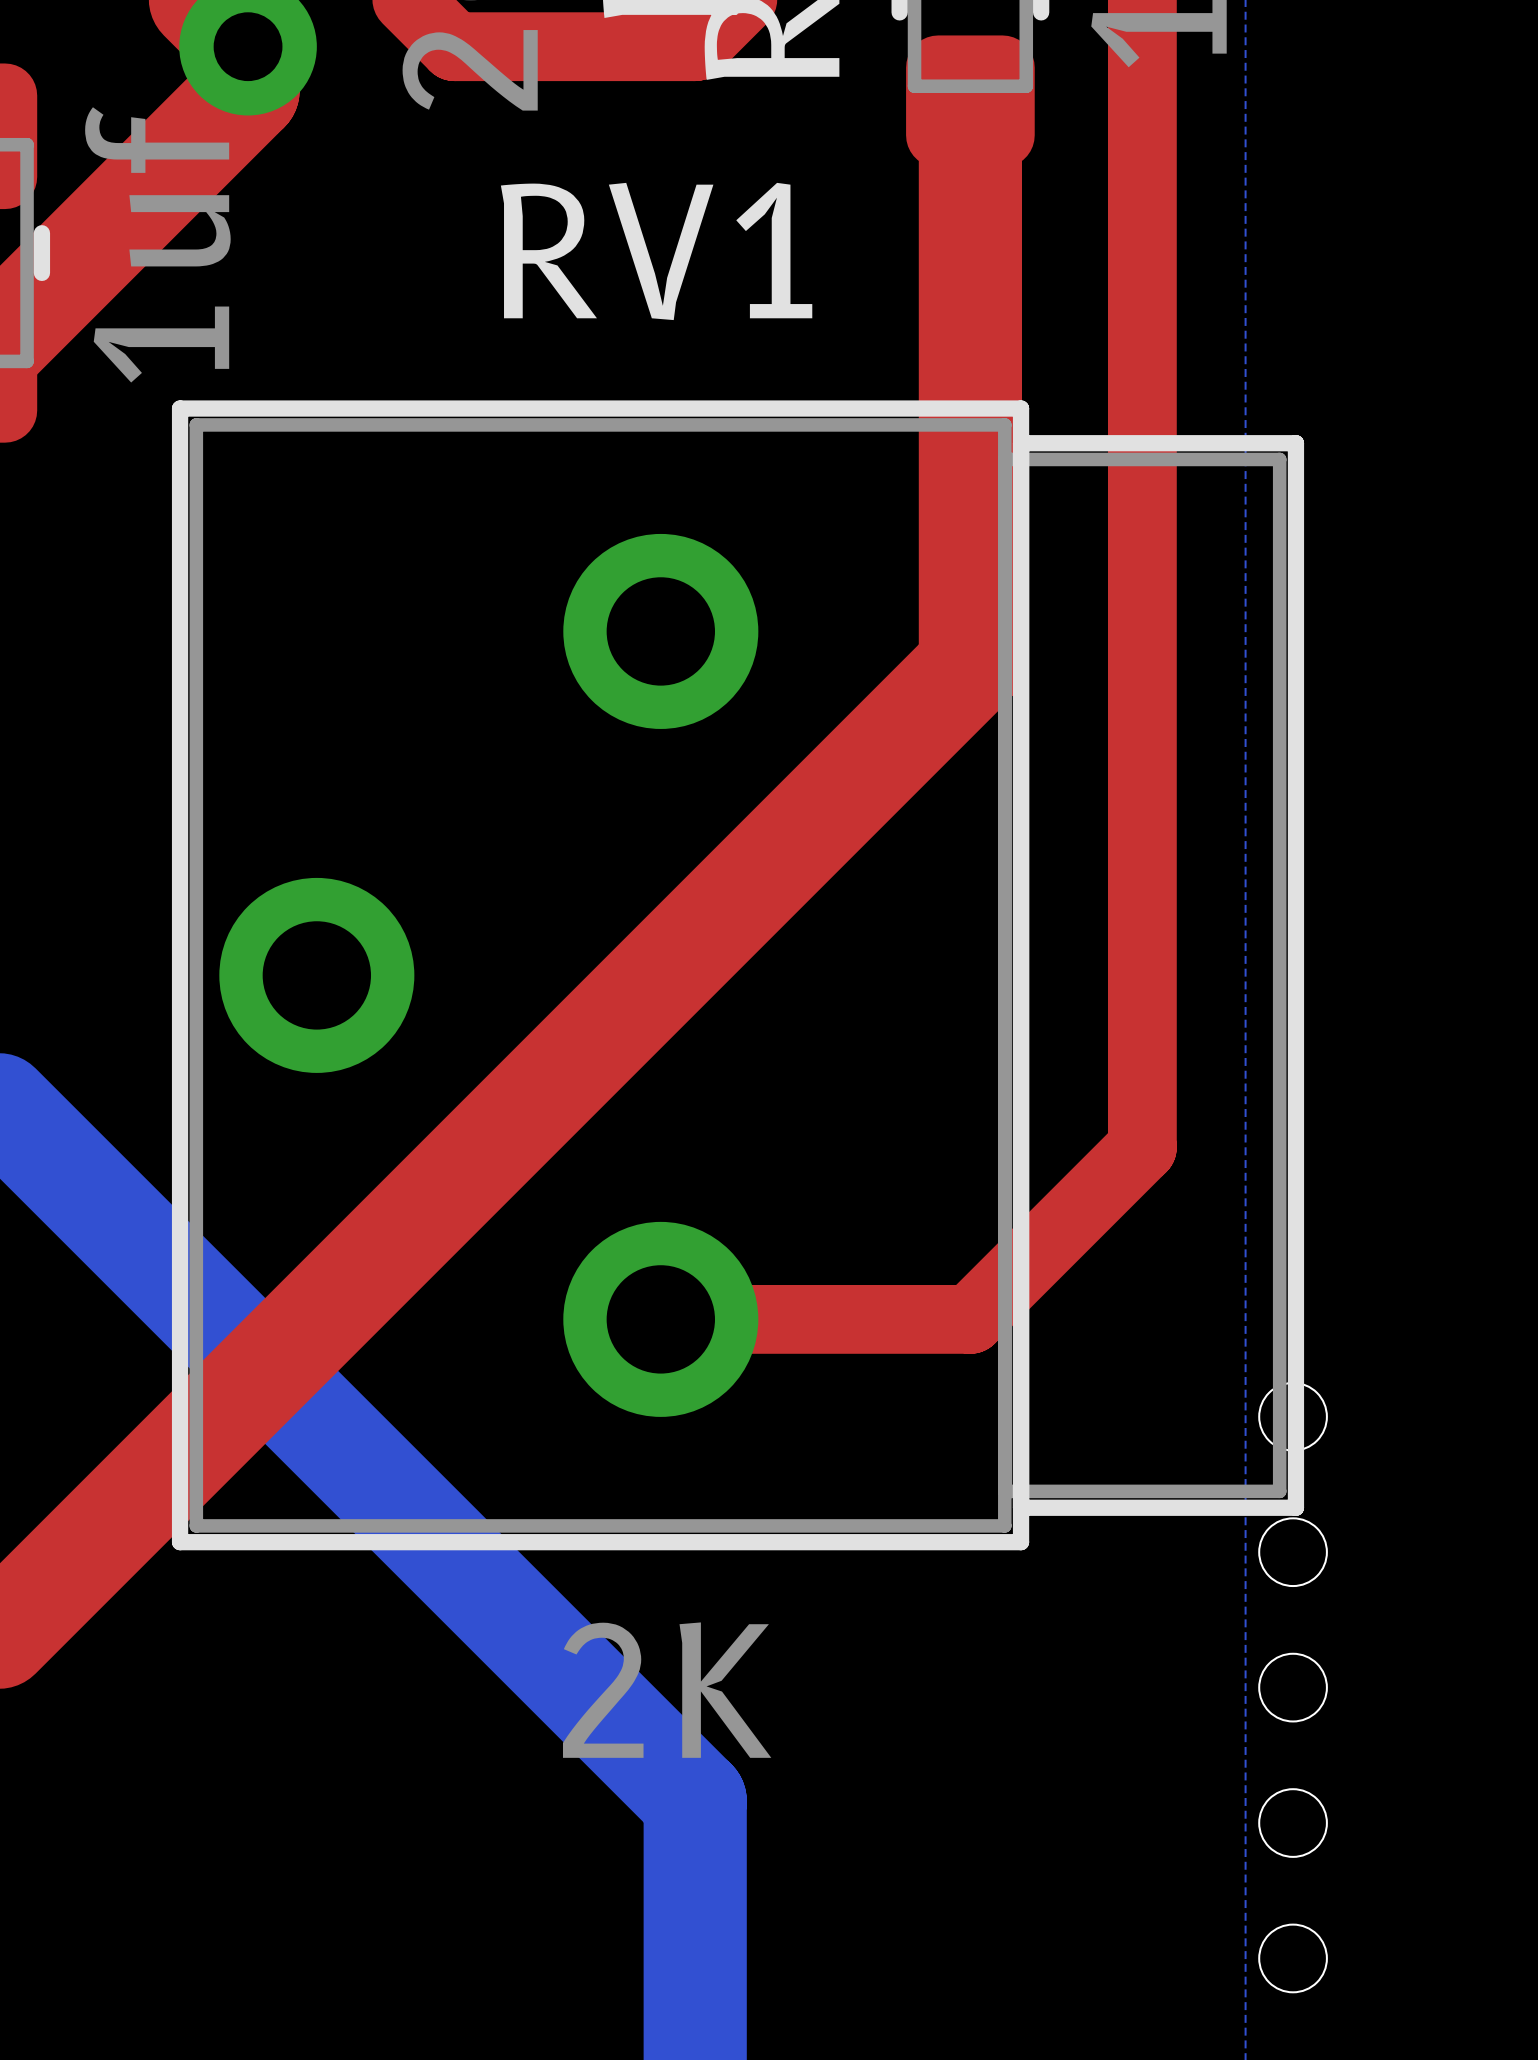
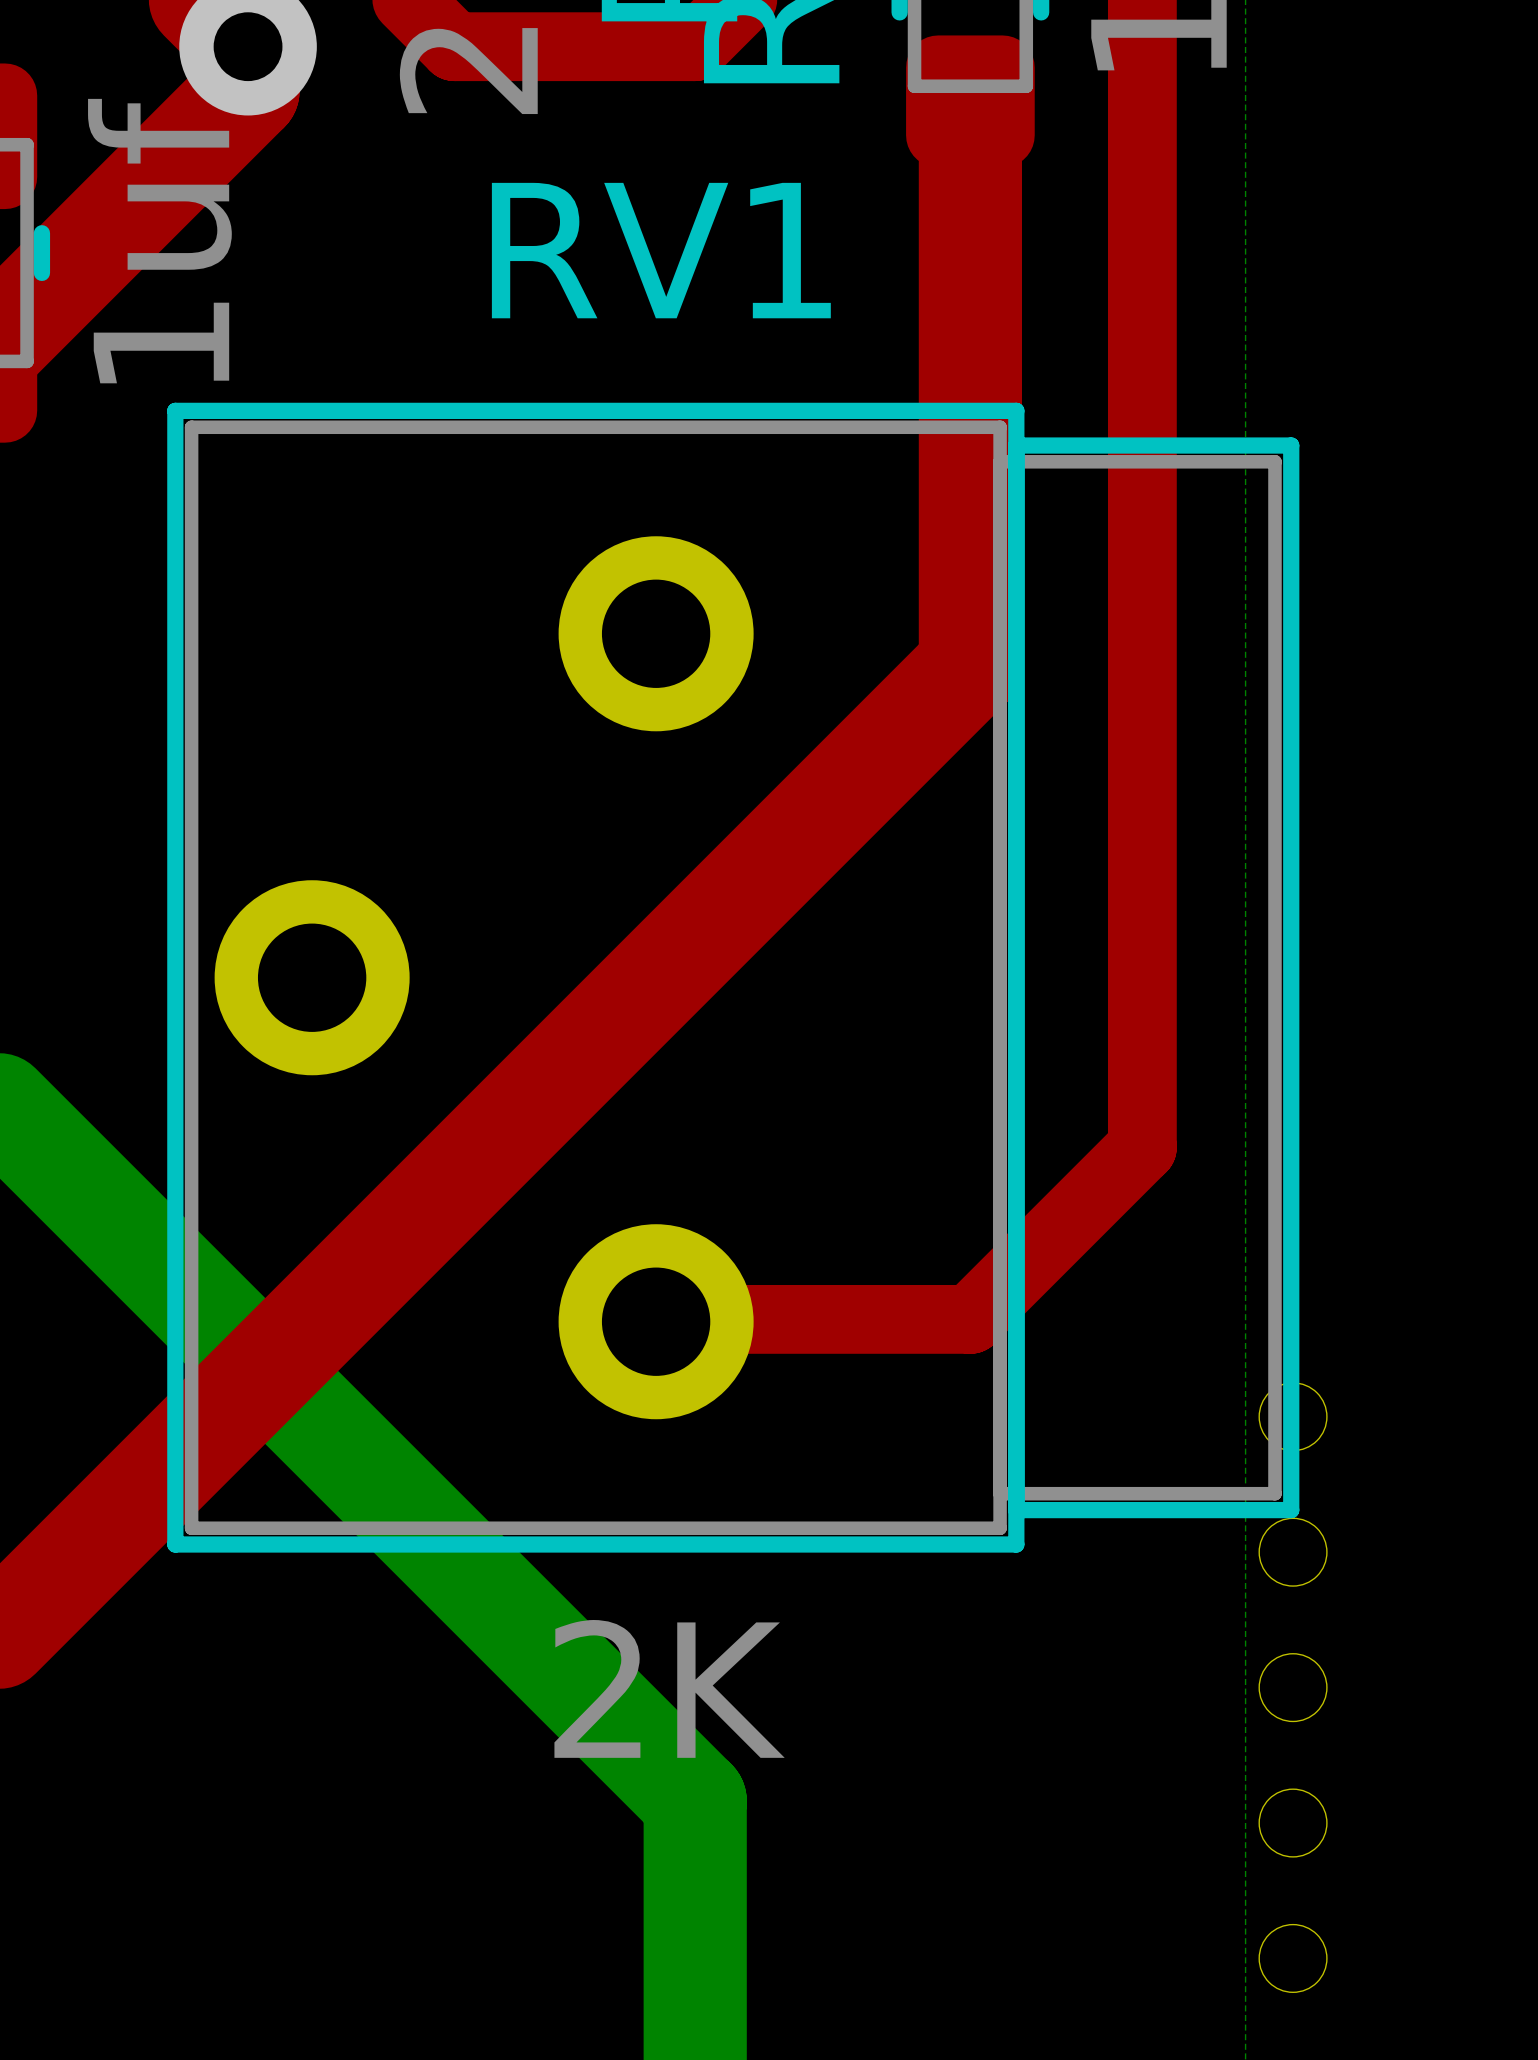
RV1 footprint: [171, 400, 1305, 1551] -> [167, 402, 1300, 1553]

